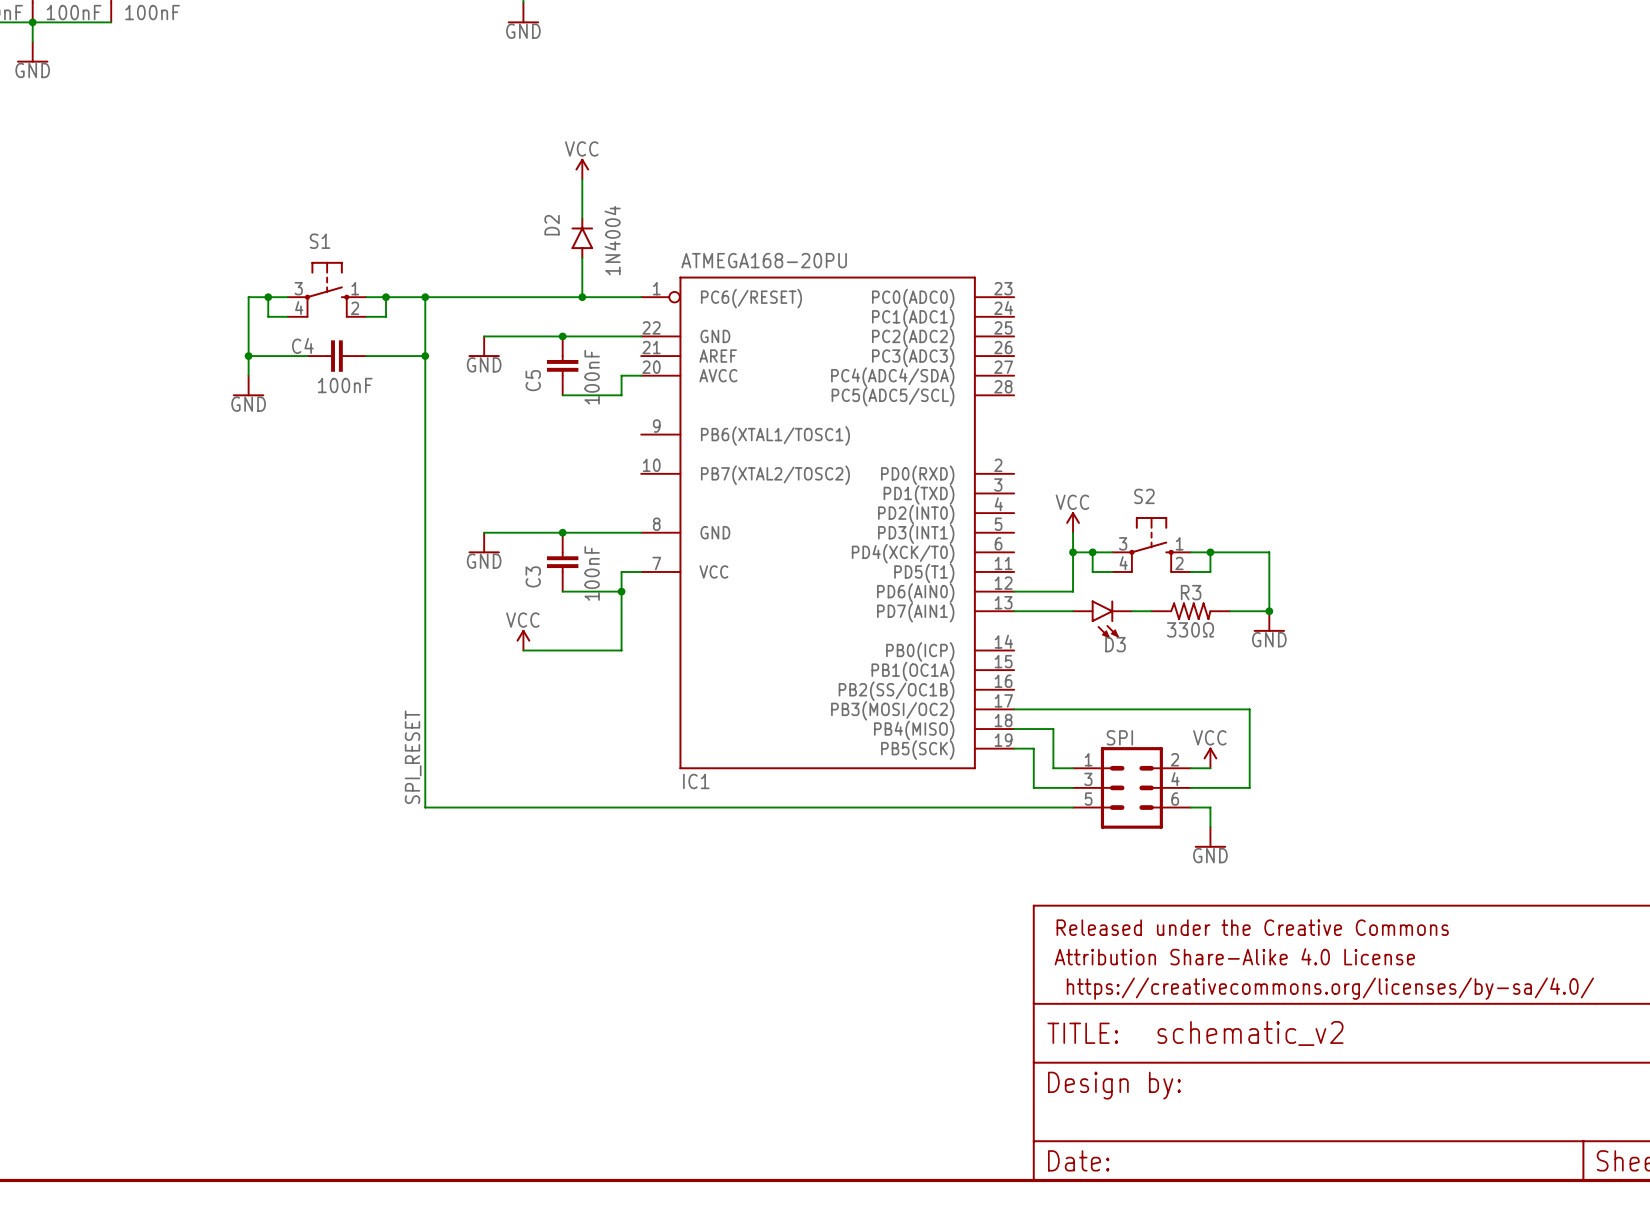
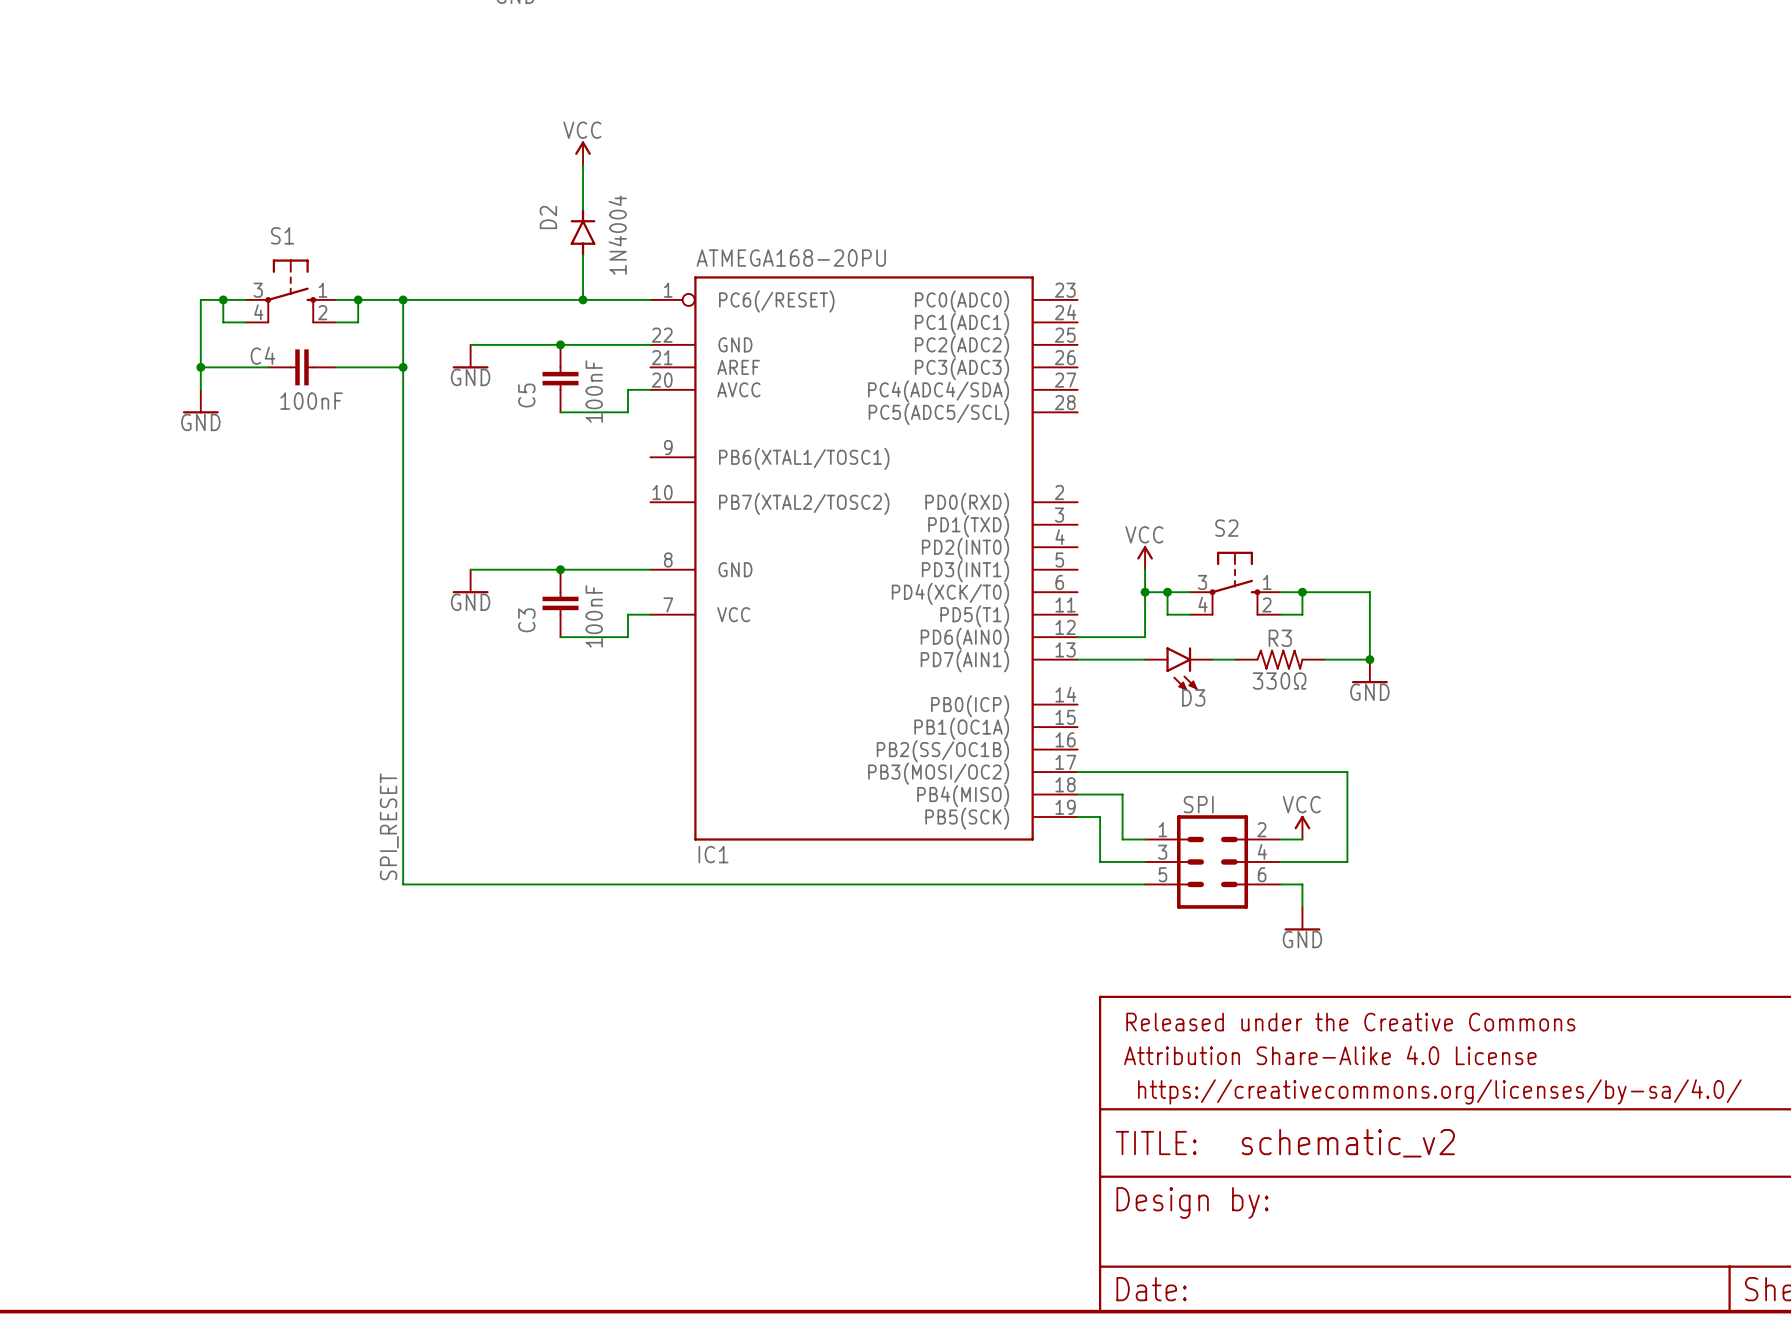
wire: (621, 591) (621, 650) (523, 650) -> none
junction: (621, 591) -> none
power symbol: VCC (523, 640) -> none

